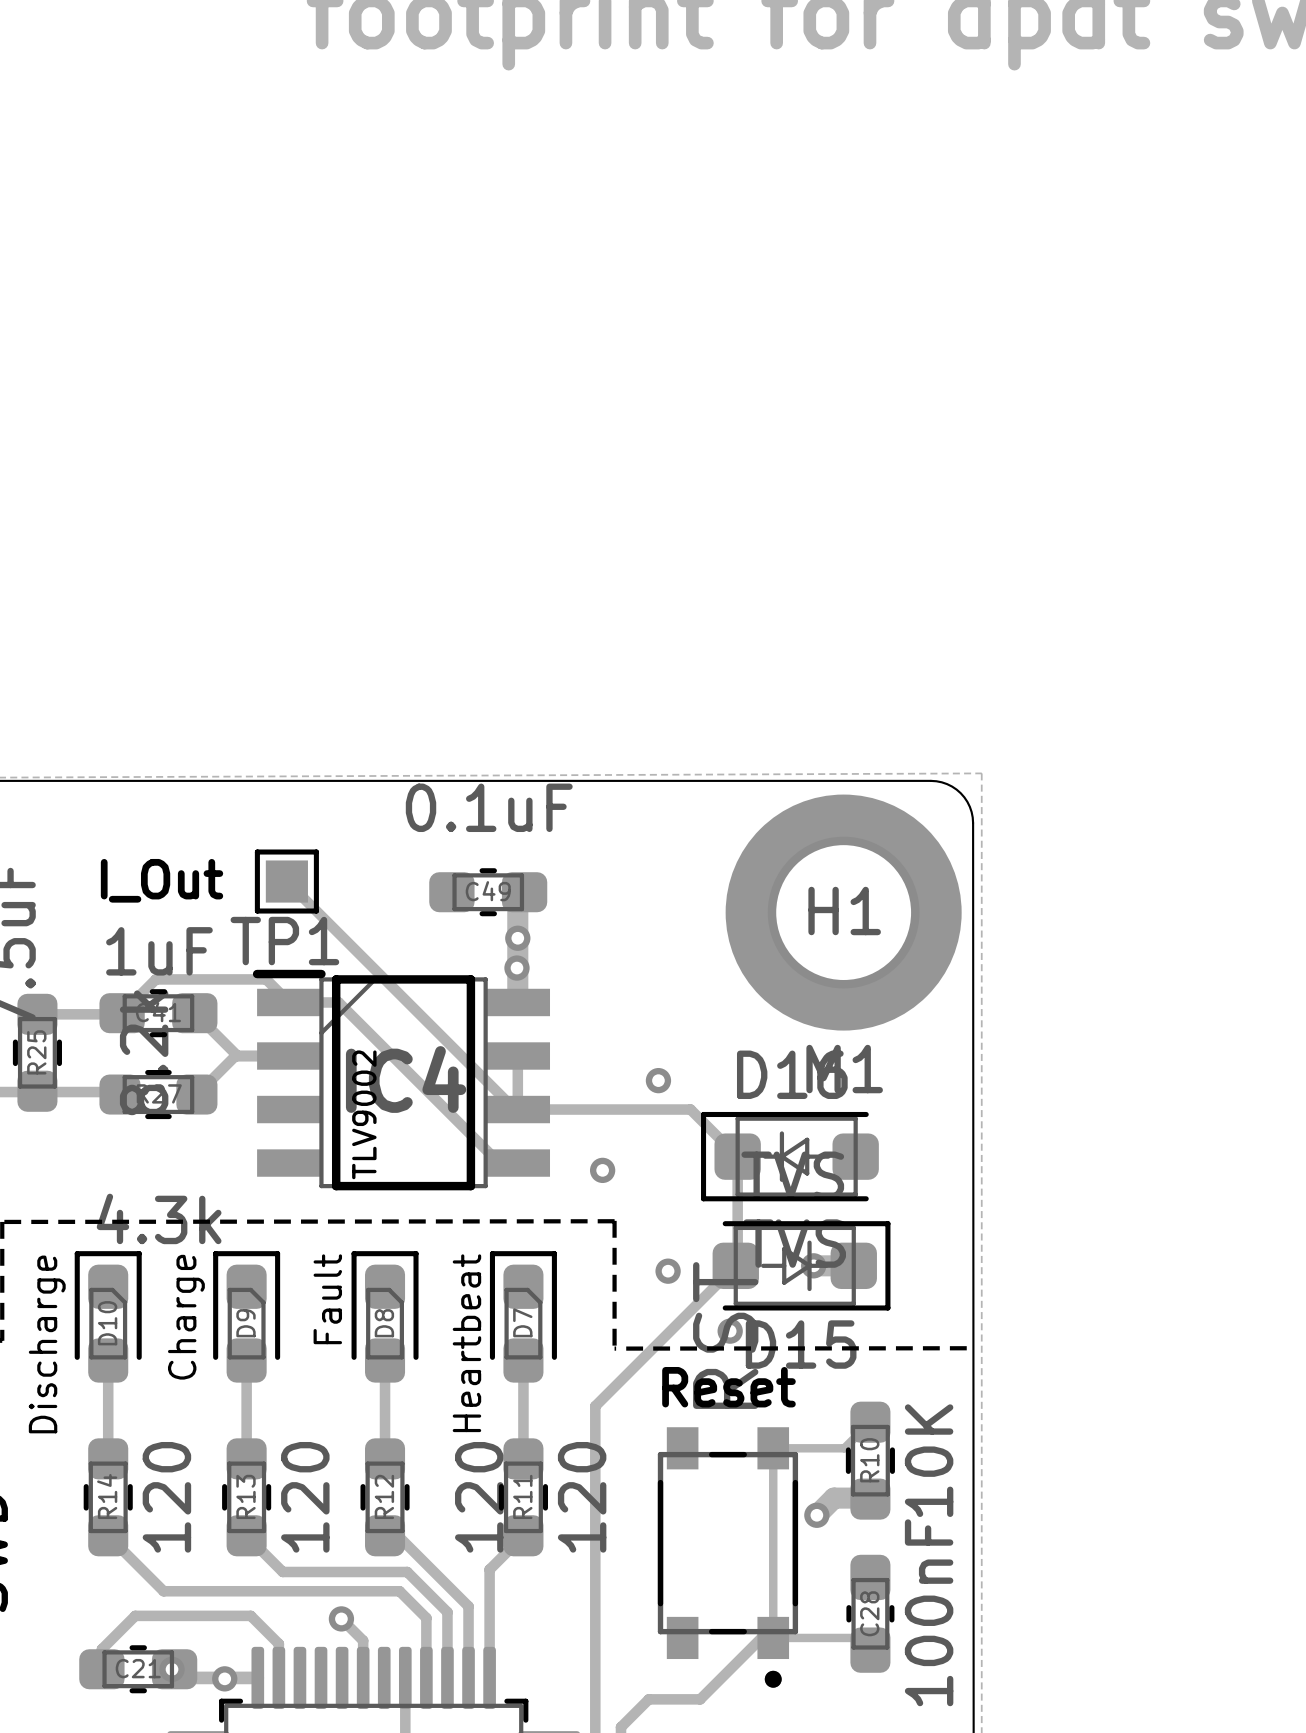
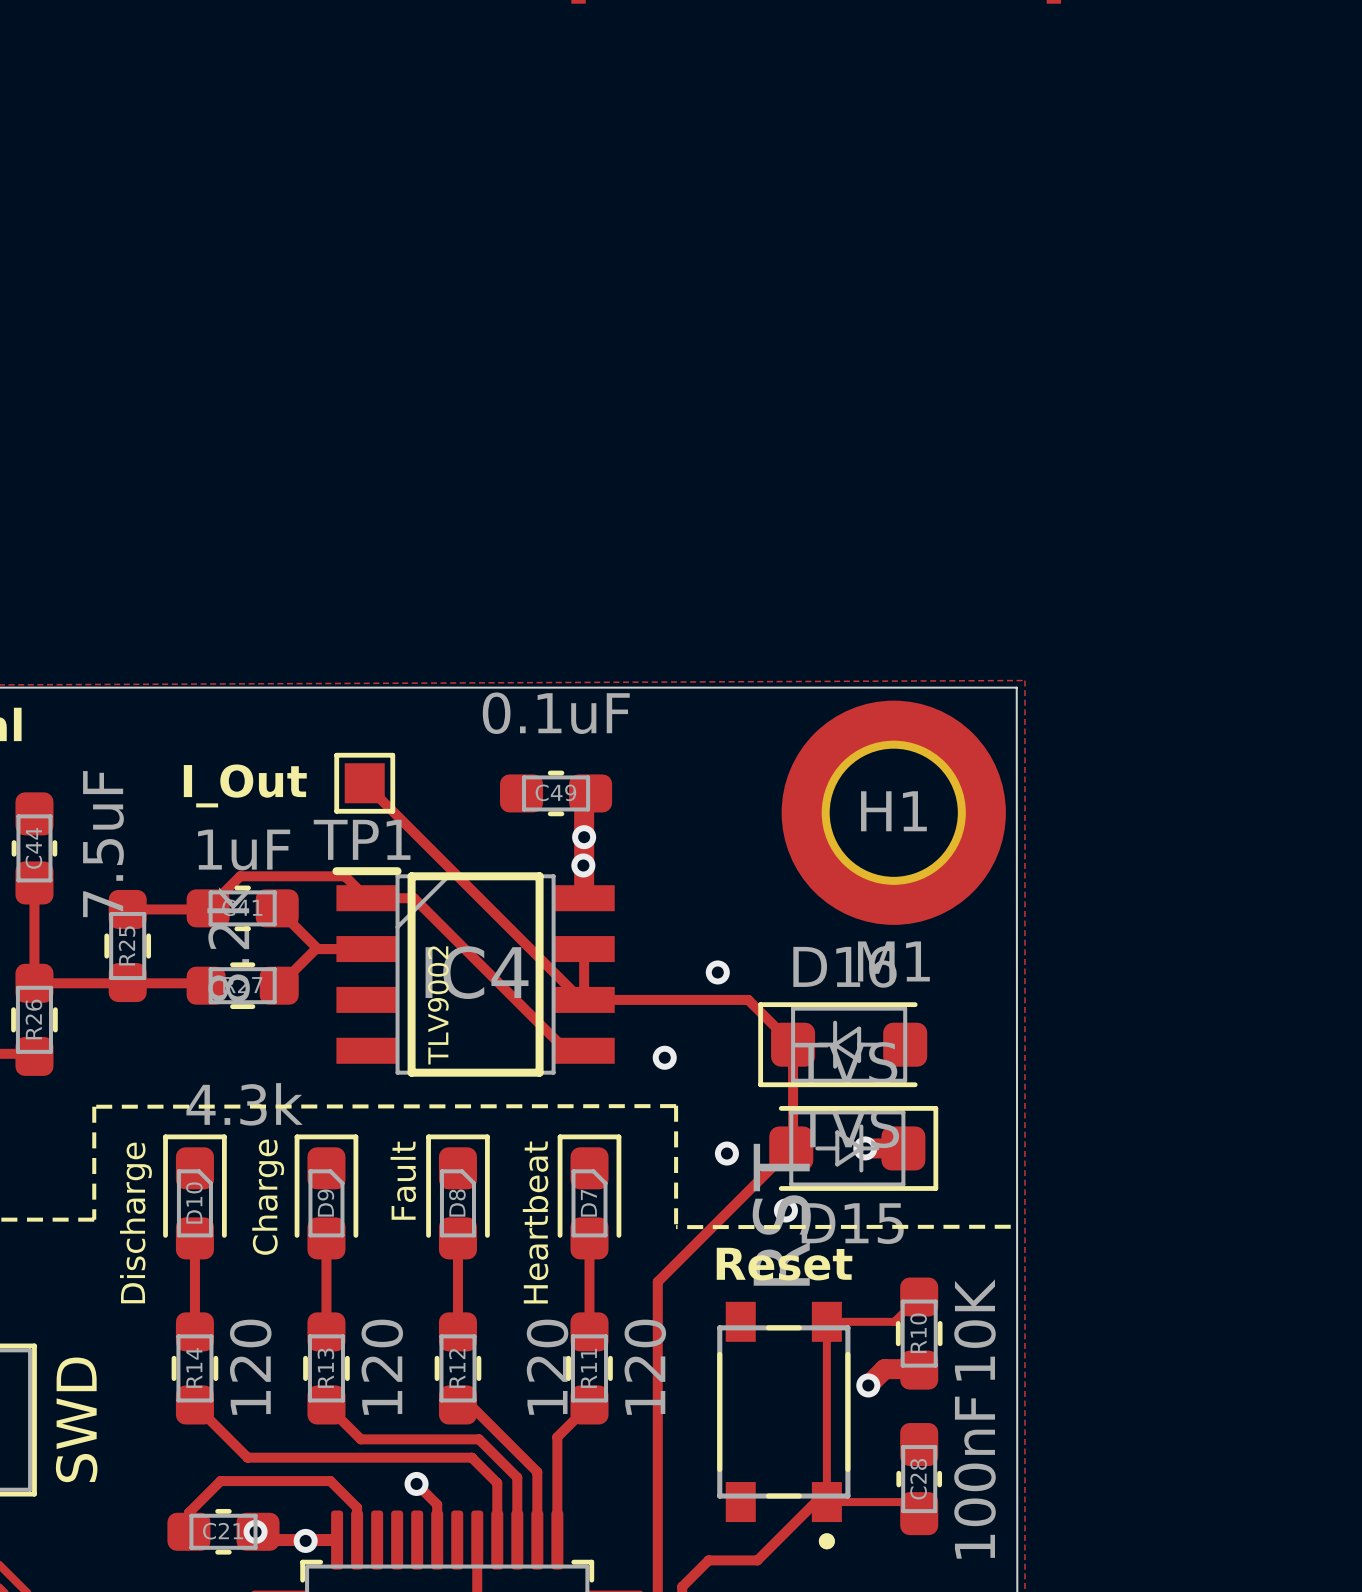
board edge: (930, 780) (947, 784) (960, 793) (969, 806) (973, 823) -> (976, 687) (1016, 687) (1016, 727)

